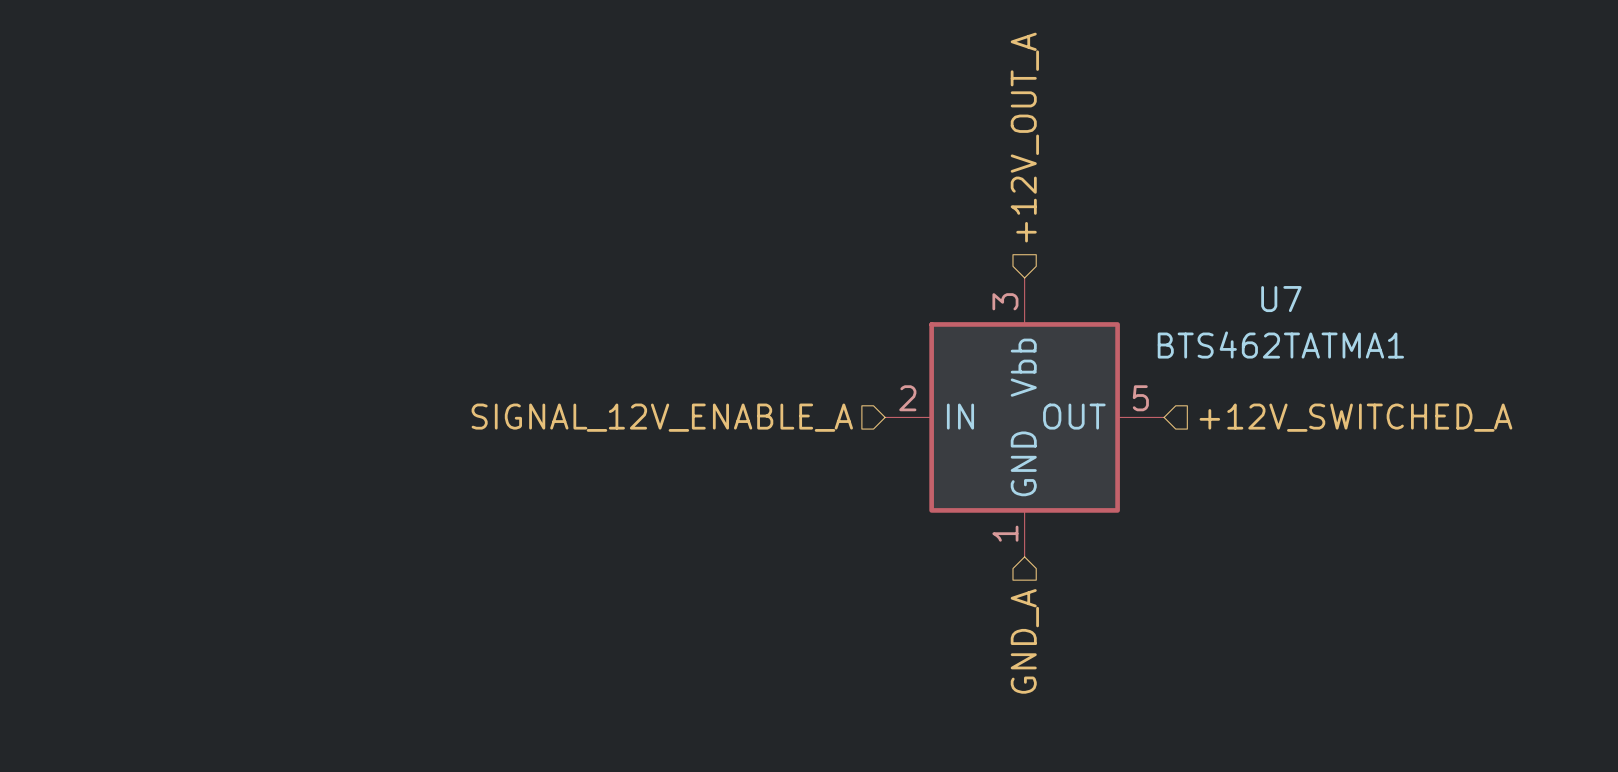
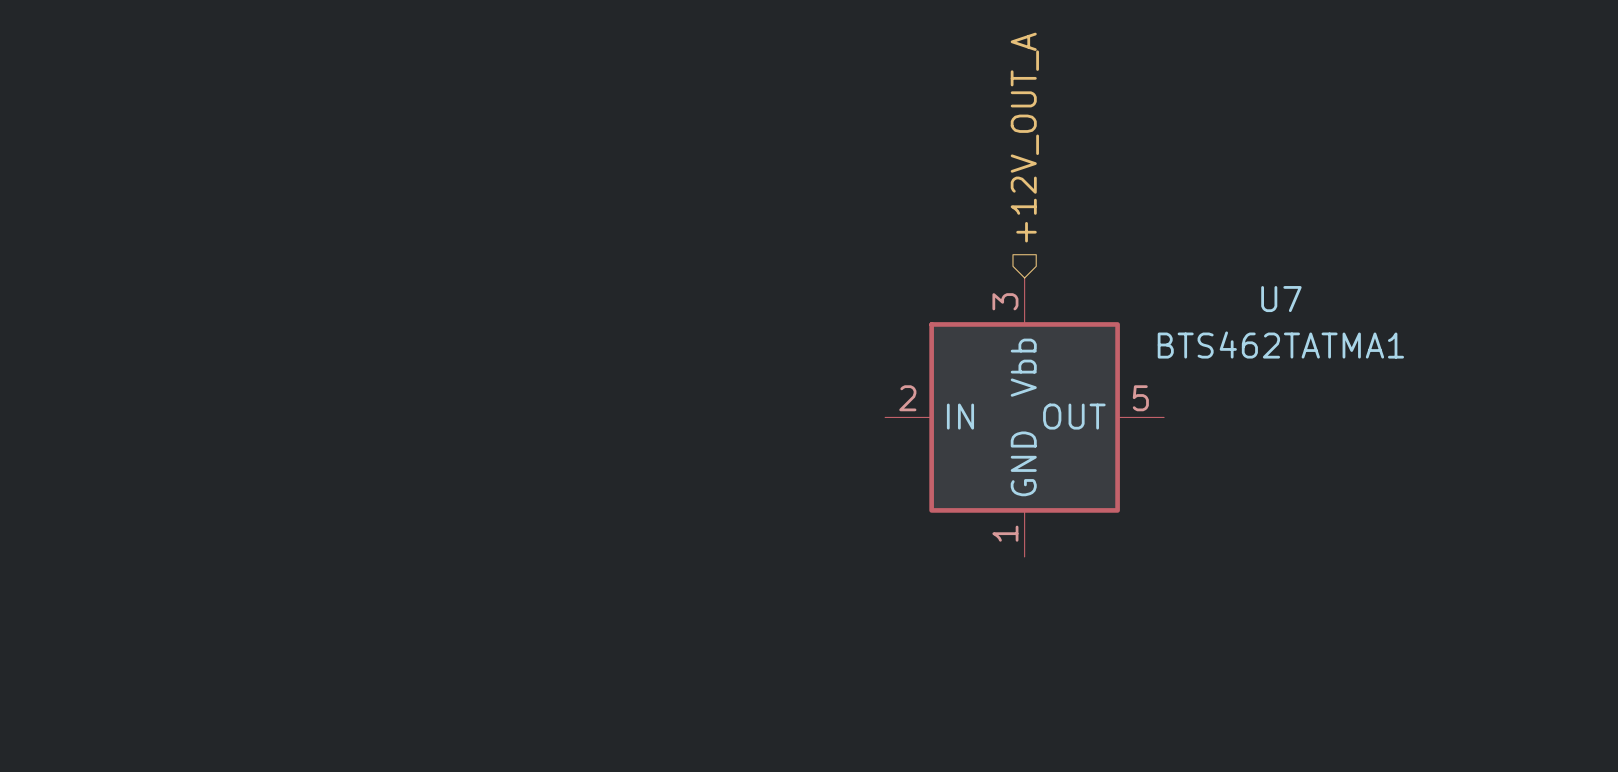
hierarchical label: SIGNAL_12V_ENABLE_A (662, 417) -> none
hierarchical label: +12V_SWITCHED_A (1355, 417) -> none
hierarchical label: GND_A (1024, 641) -> none

